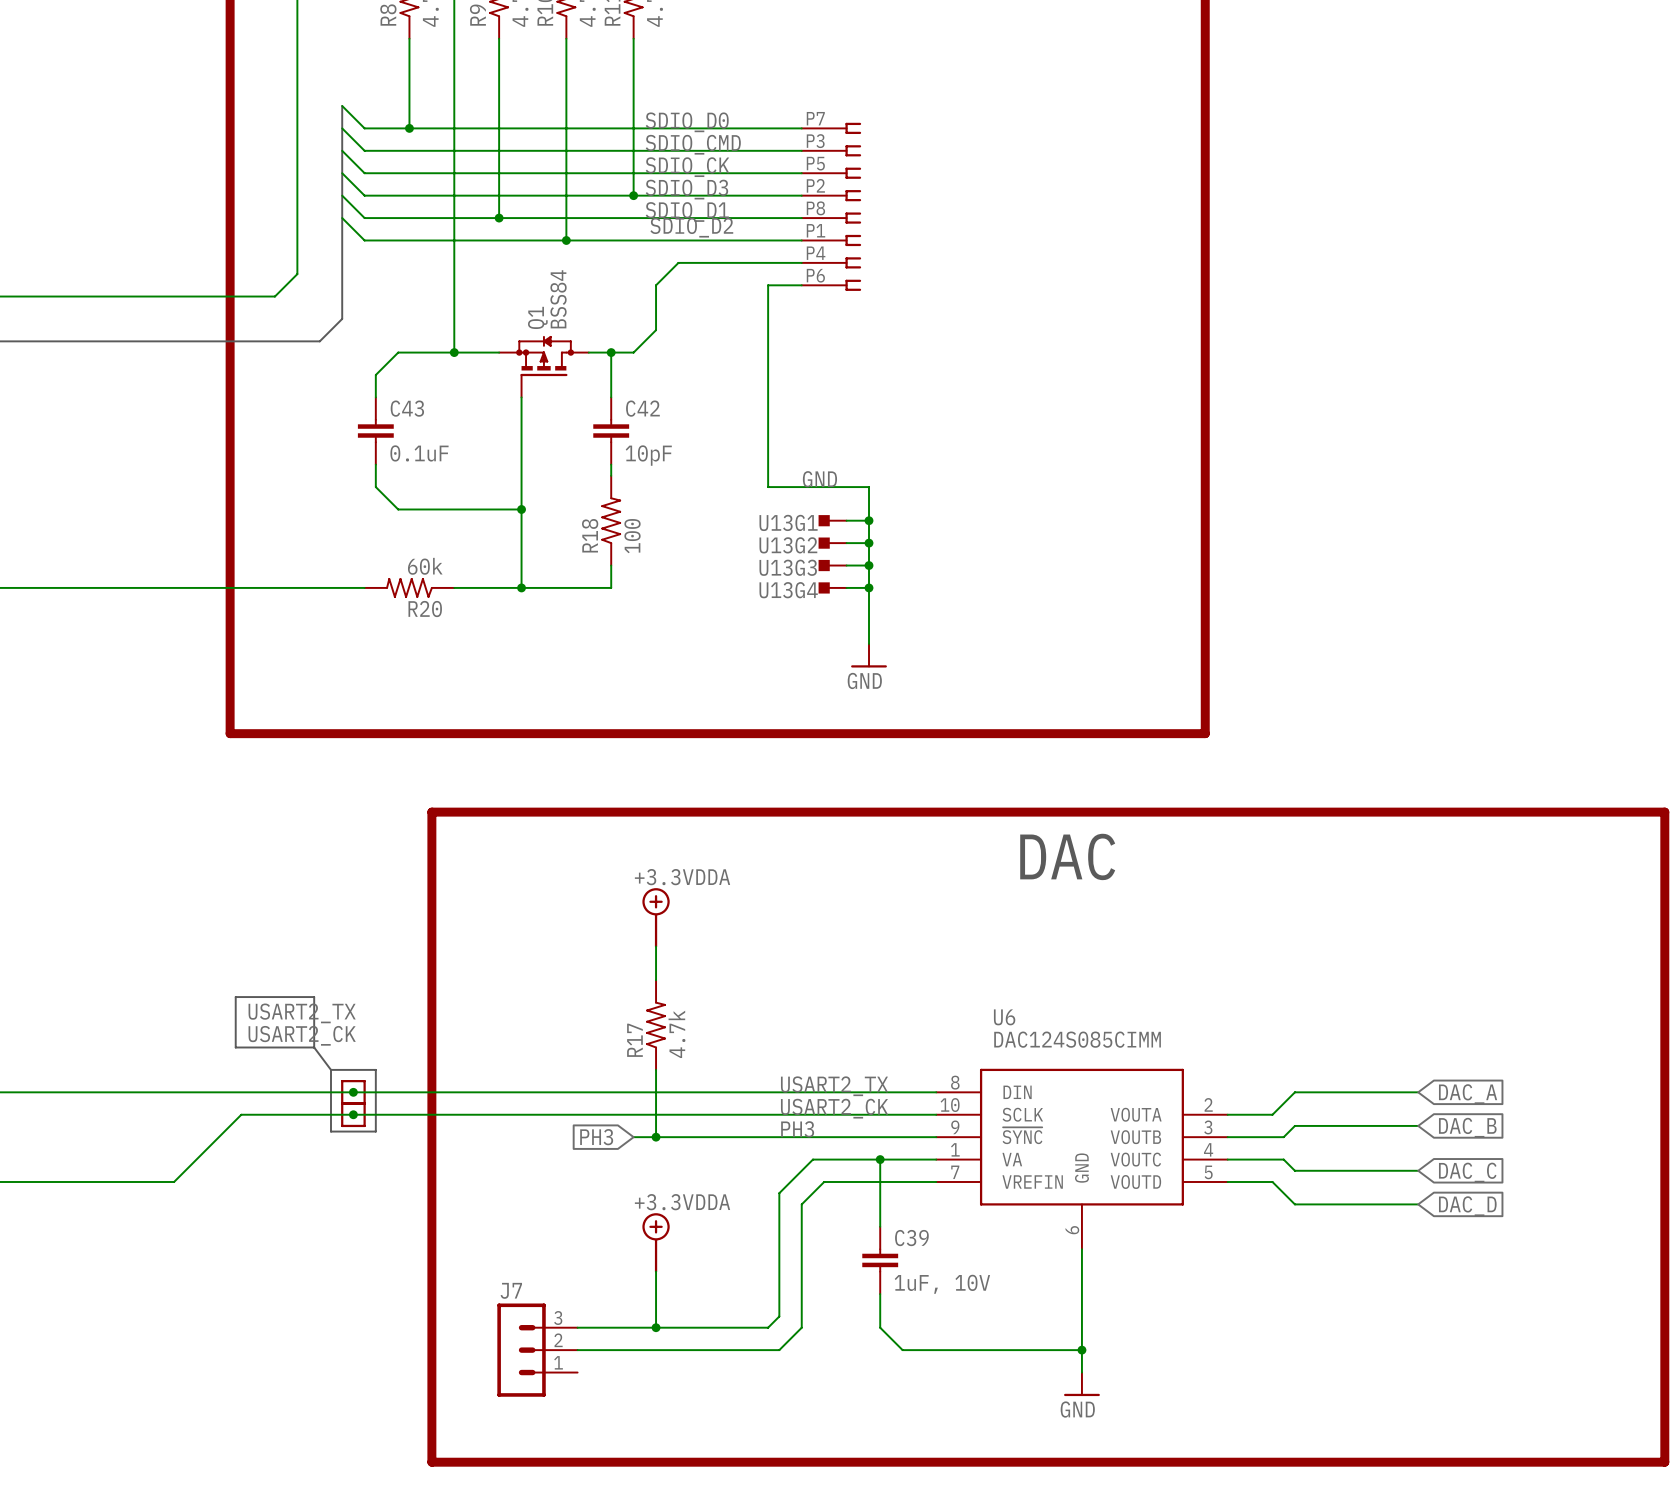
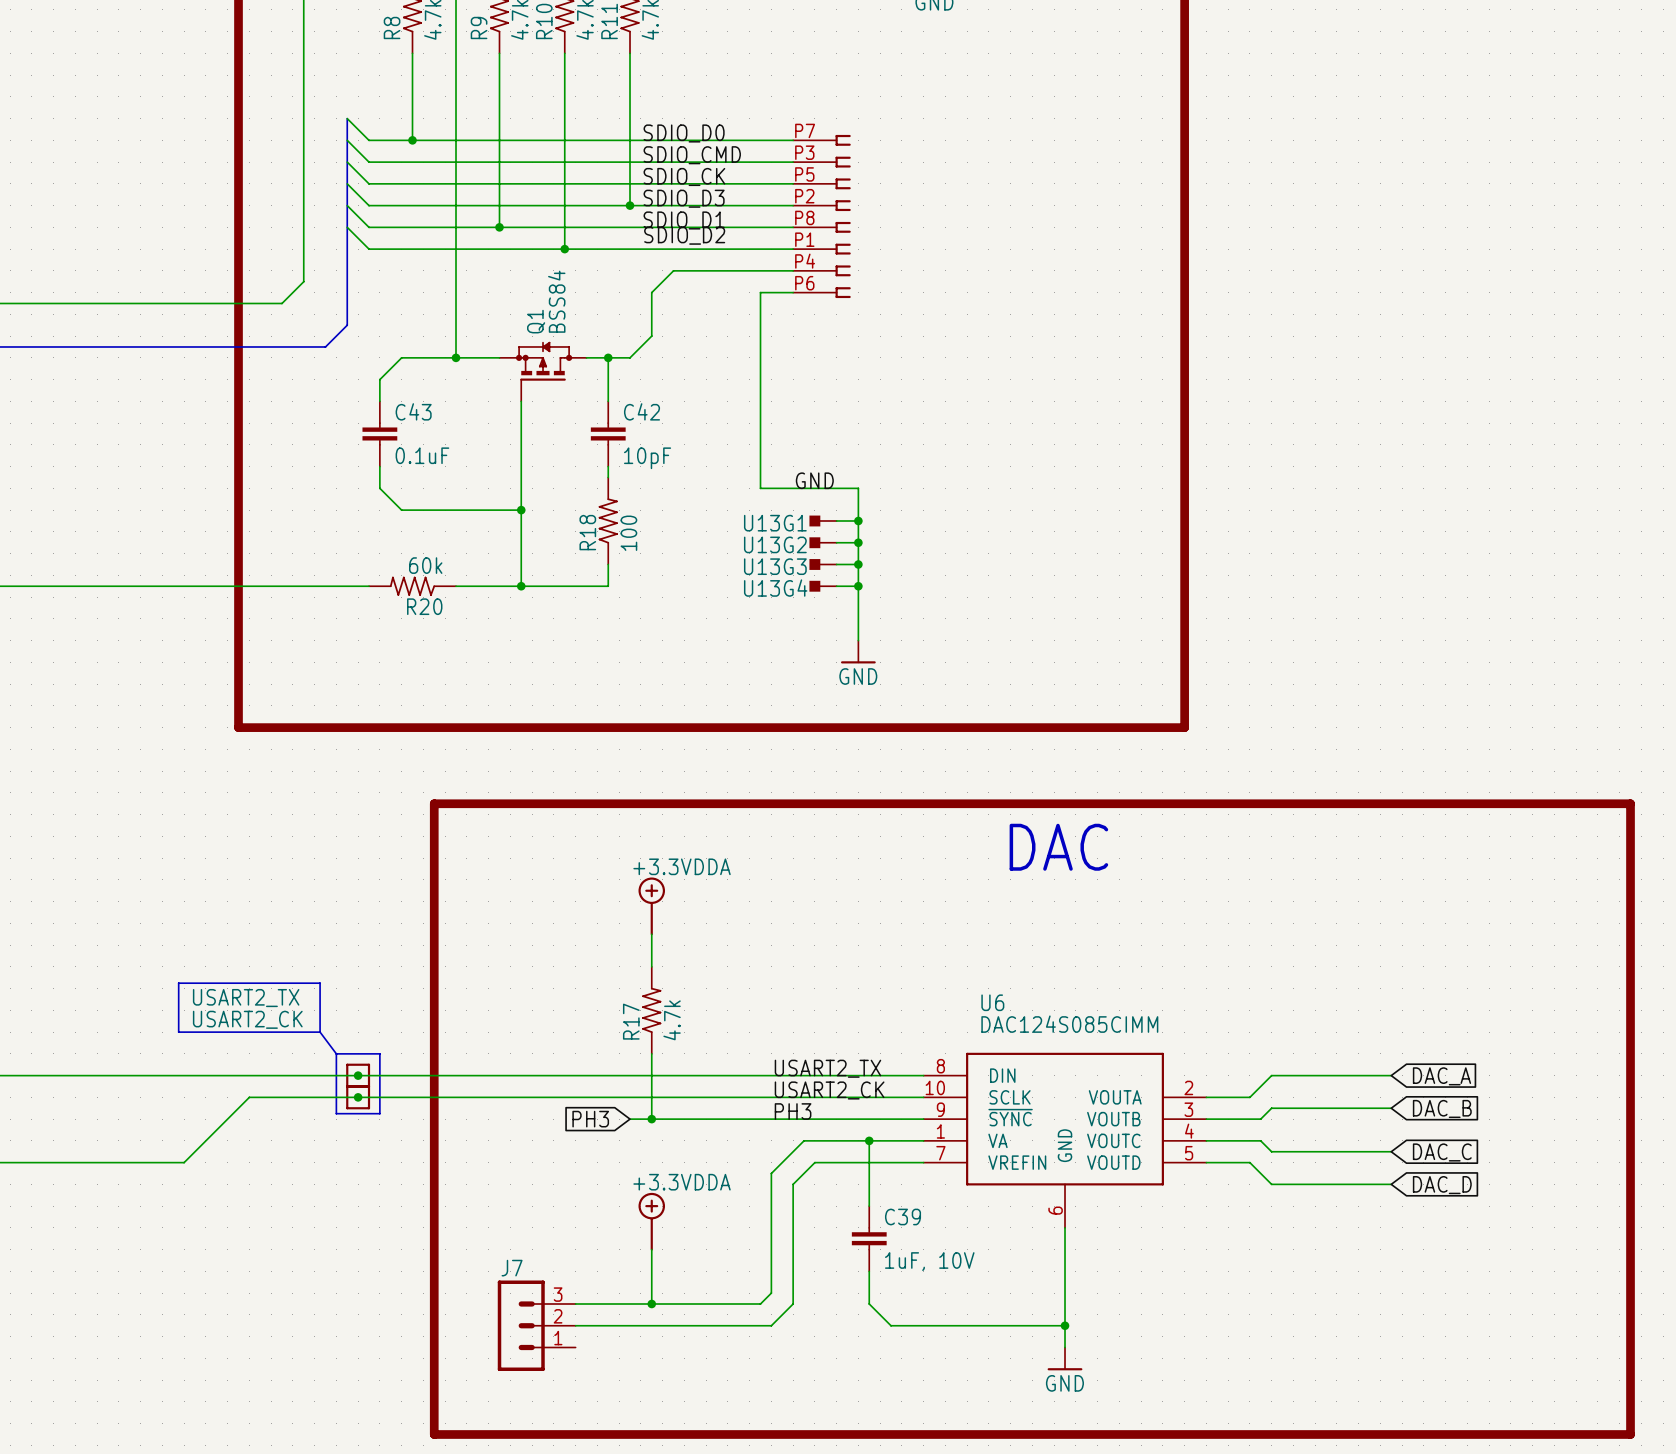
line: (235, 997) (235, 1047) -> (243, 983) (178, 983) (178, 1032) (243, 1032)
USART2_TX name position: USART2_TX (302, 1013) -> USART2_TX (246, 998)
USART2_CK name position: USART2_CK (302, 1035) -> USART2_CK (247, 1019)

